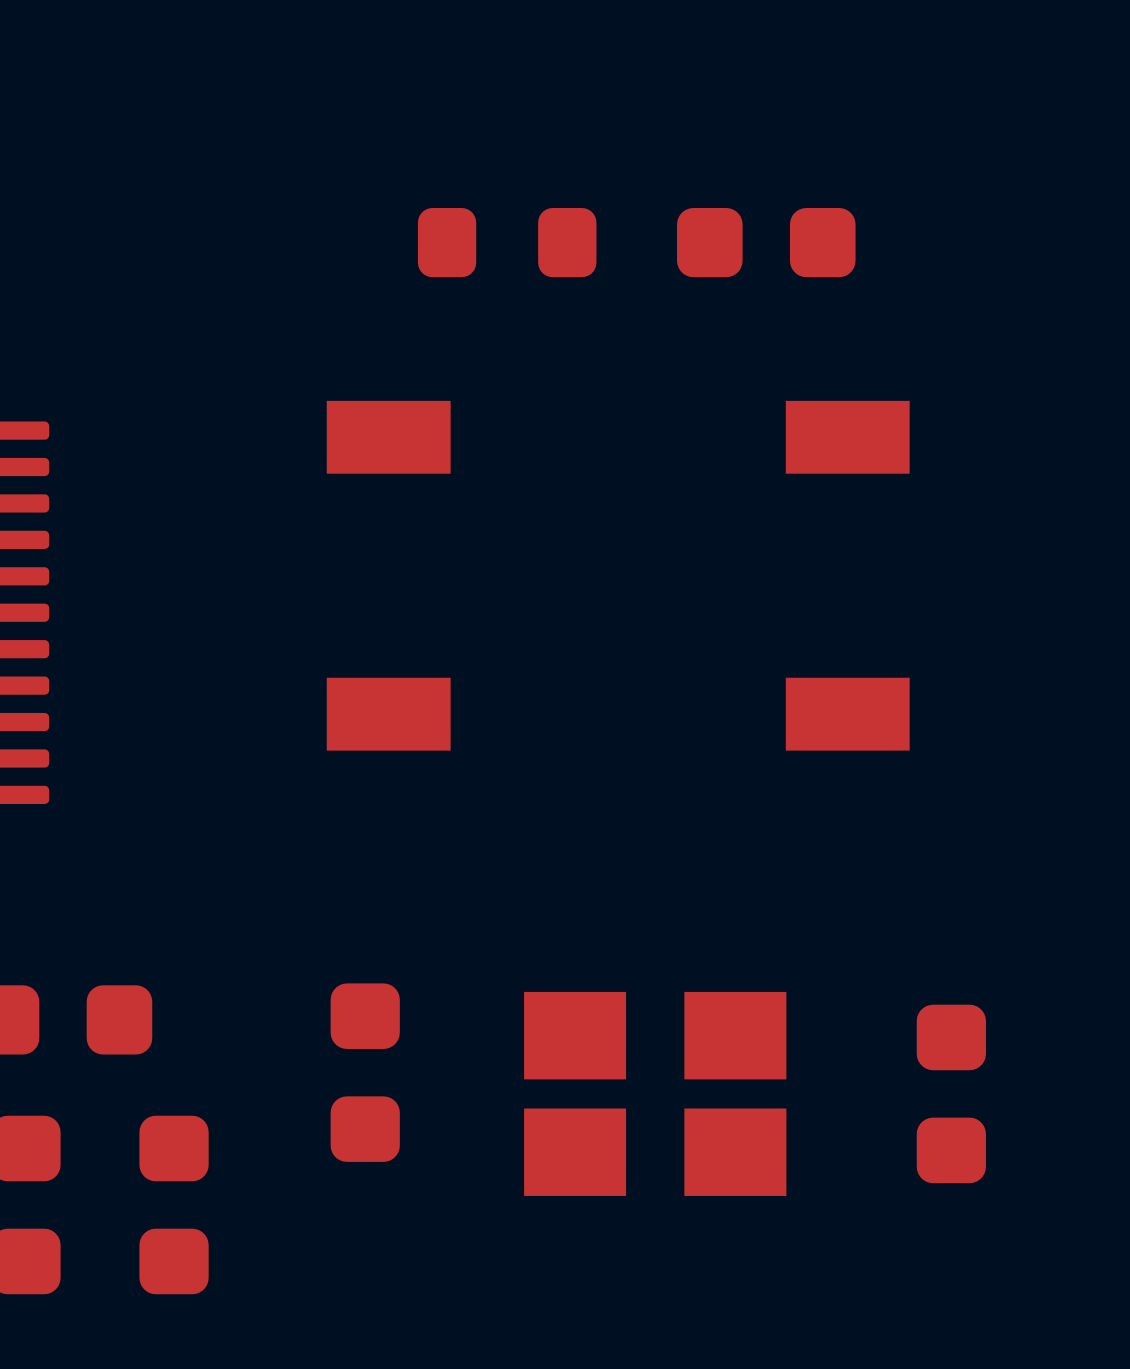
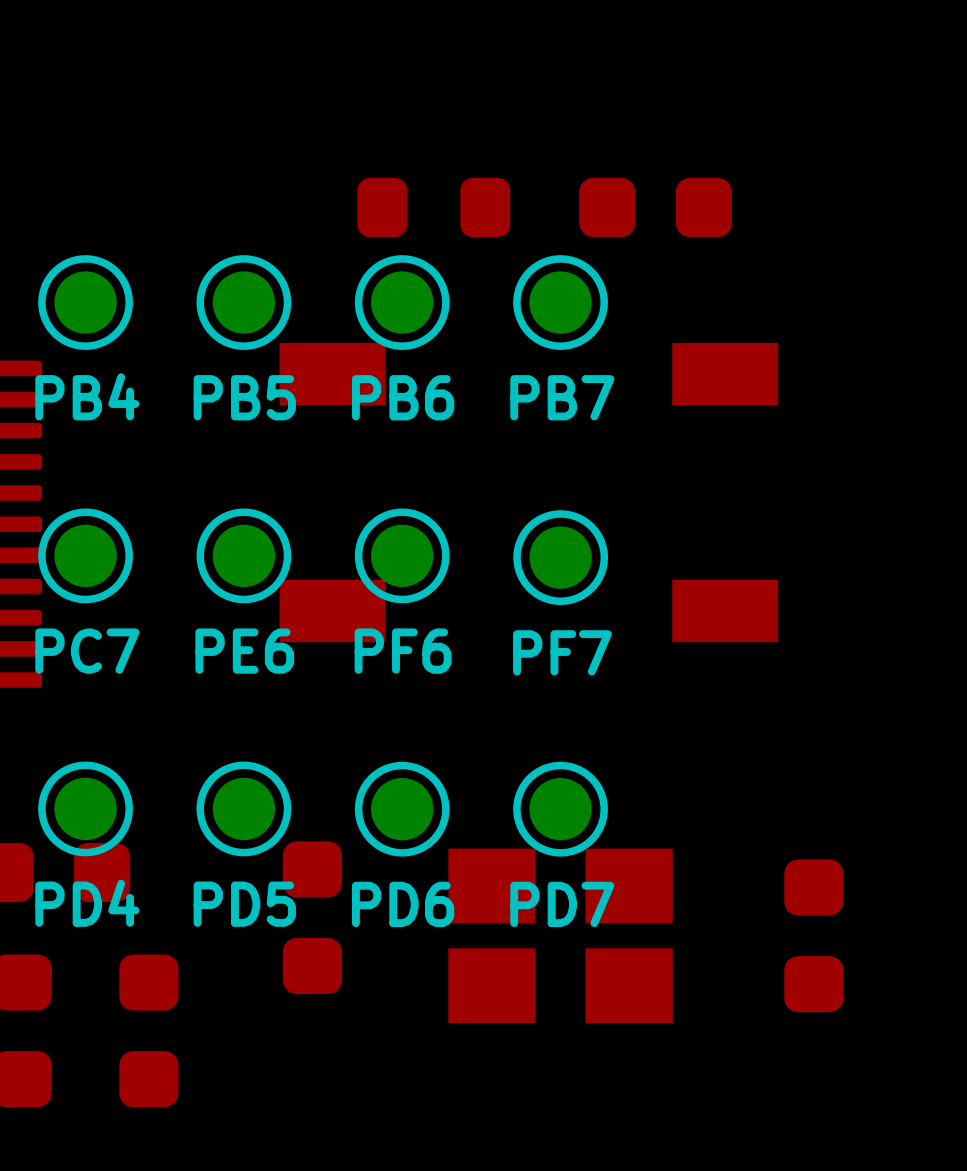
part: none -> PB4 (85, 302)
part: none -> PB5 (243, 302)
part: none -> PB6 (402, 302)
part: none -> PB7 (560, 302)
part: none -> PC7 (85, 555)
part: none -> PE6 (243, 555)
part: none -> PF6 (402, 555)
part: none -> PF7 (560, 557)
part: none -> PD4 (85, 808)
part: none -> PD5 (243, 808)
part: none -> PD6 (402, 809)
part: none -> PD7 (560, 809)

